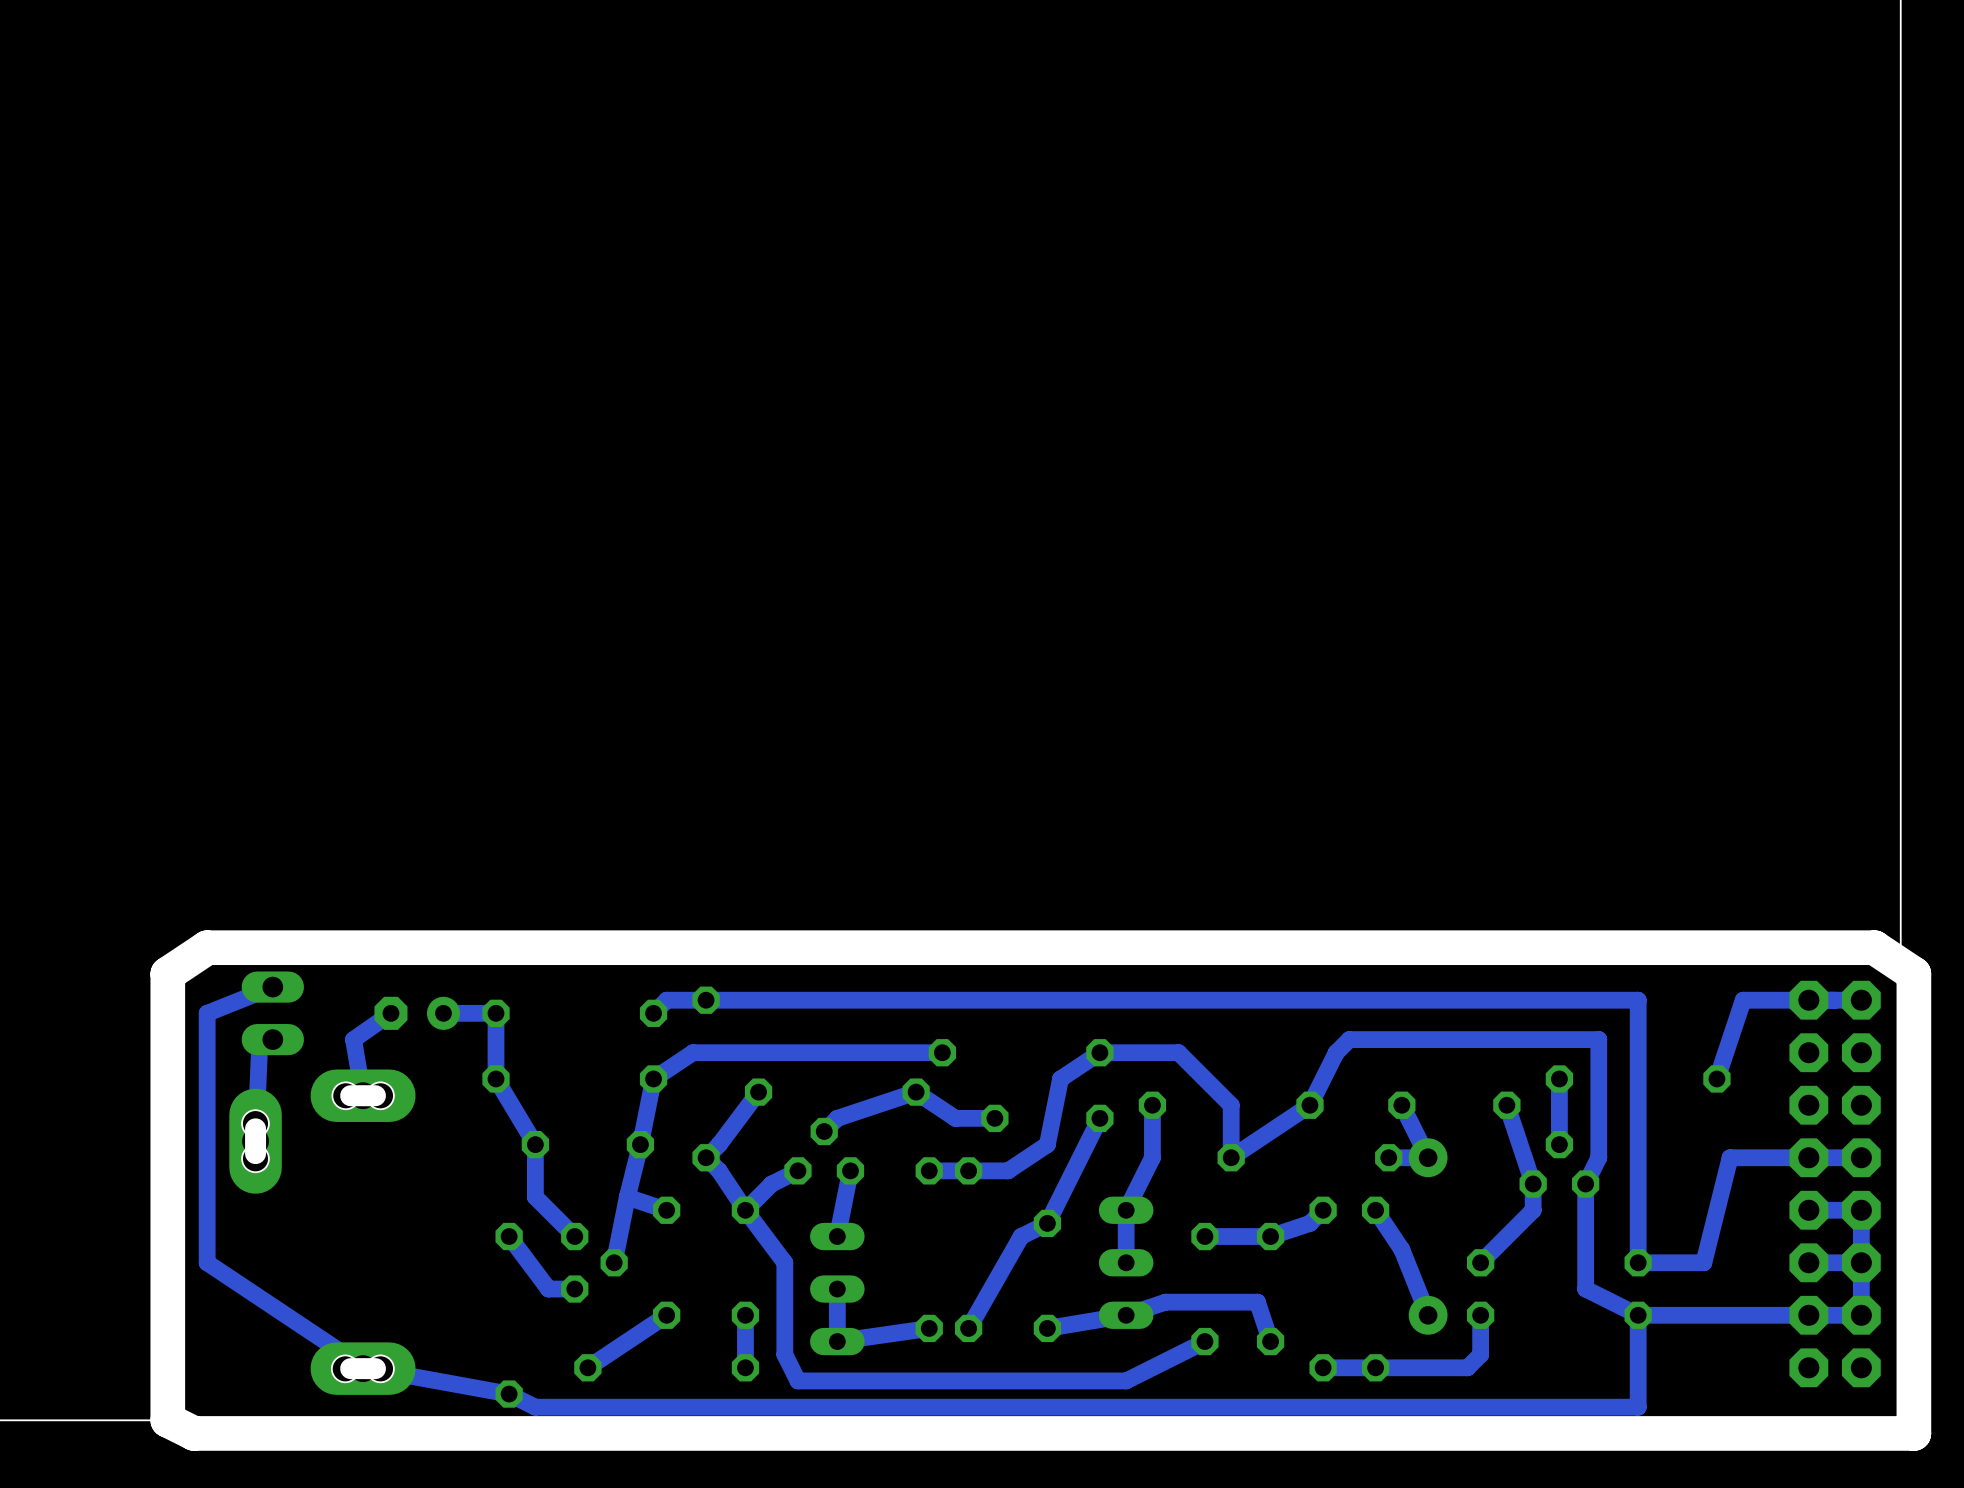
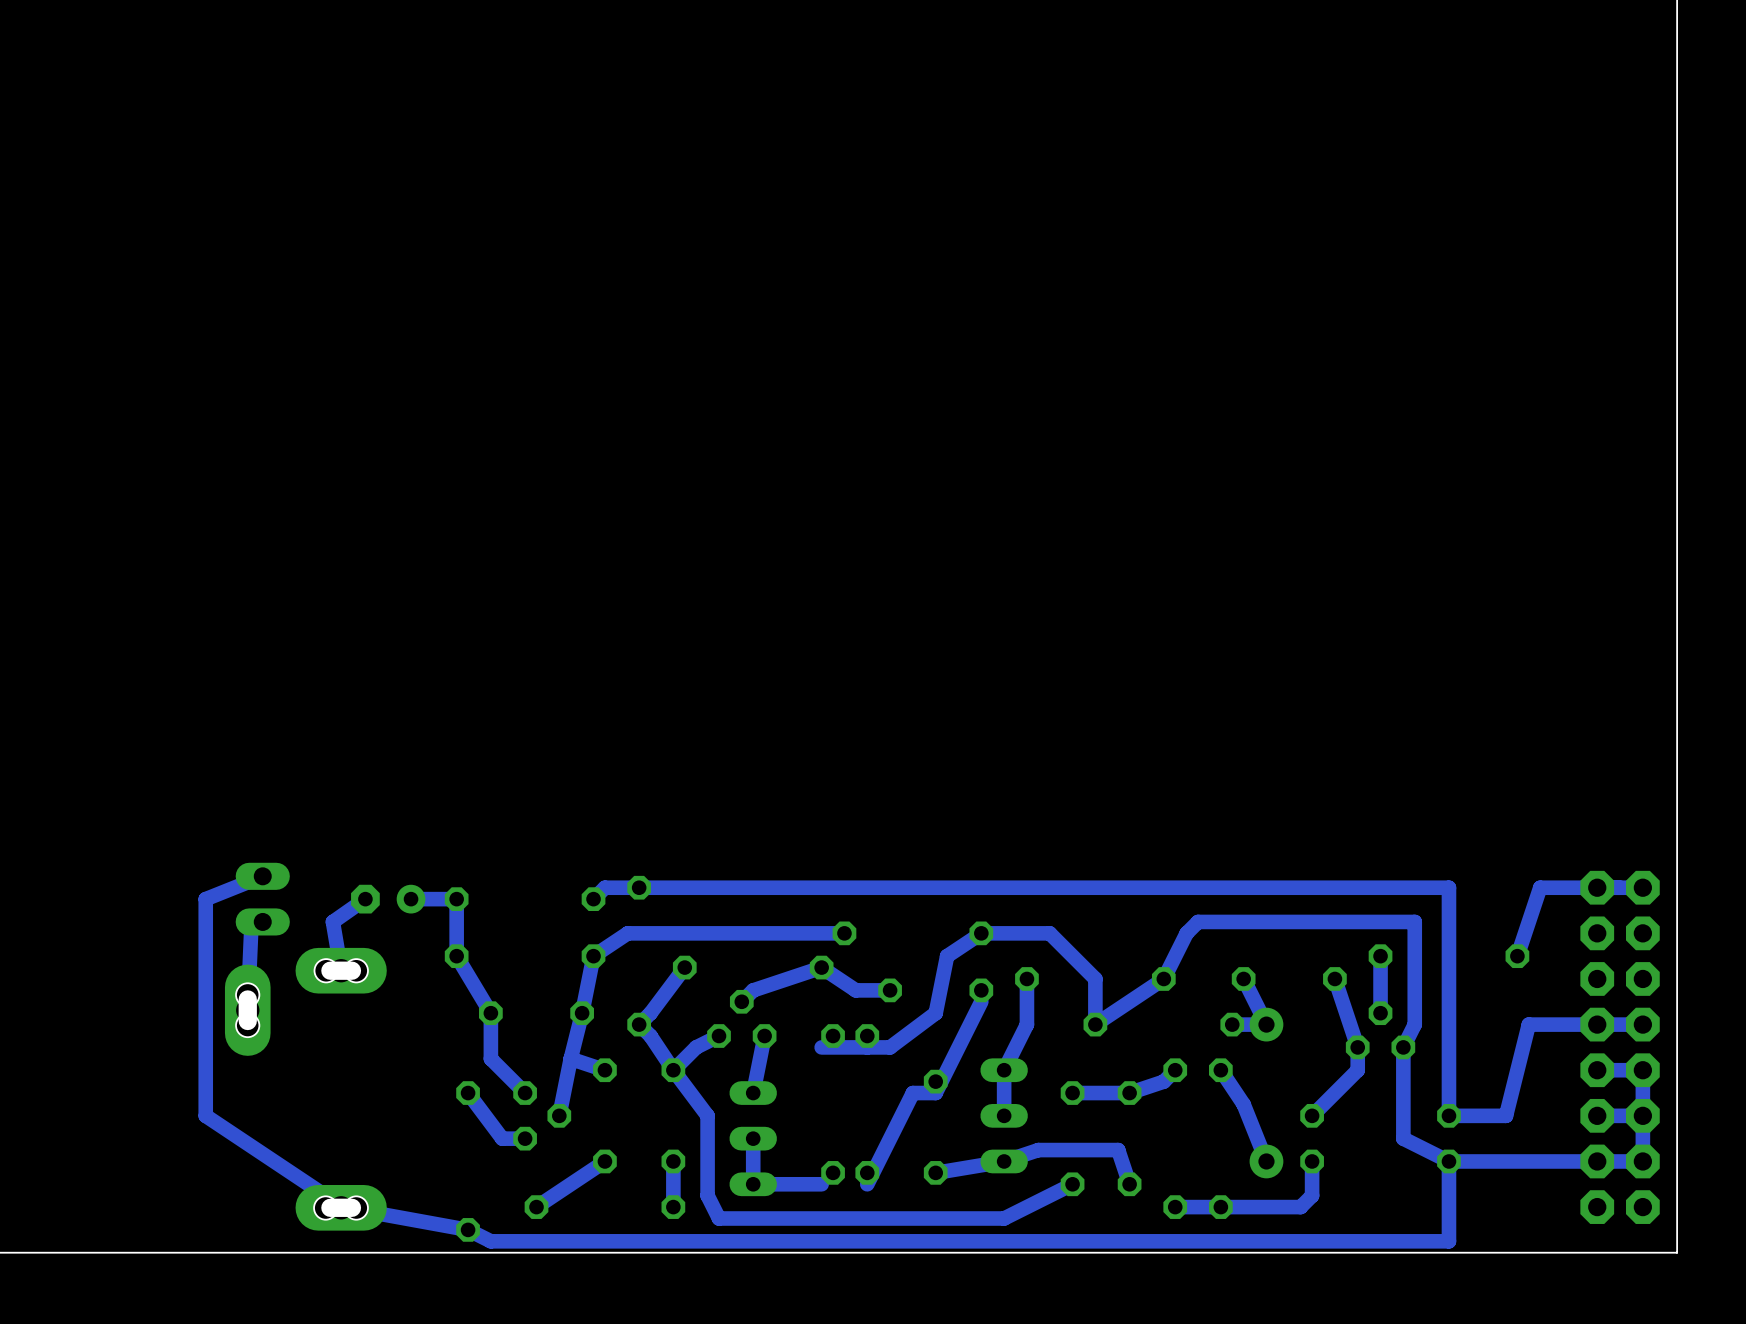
board edge: (1874, 947) (1913, 973) (1913, 1433) (194, 1433) (167, 1420) (167, 973) (207, 947) (1874, 947) -> none
track: (1099, 1118) (1047, 1223) (1021, 1236) (968, 1328) -> none
track: none -> (981, 1001) (935, 1093) (912, 1093) (867, 1184)
track: (1047, 1144) (1008, 1170) (929, 1170) -> (935, 1013) (890, 1047) (821, 1047)
track: (929, 1328) (837, 1341) -> (821, 1184) (753, 1184)

